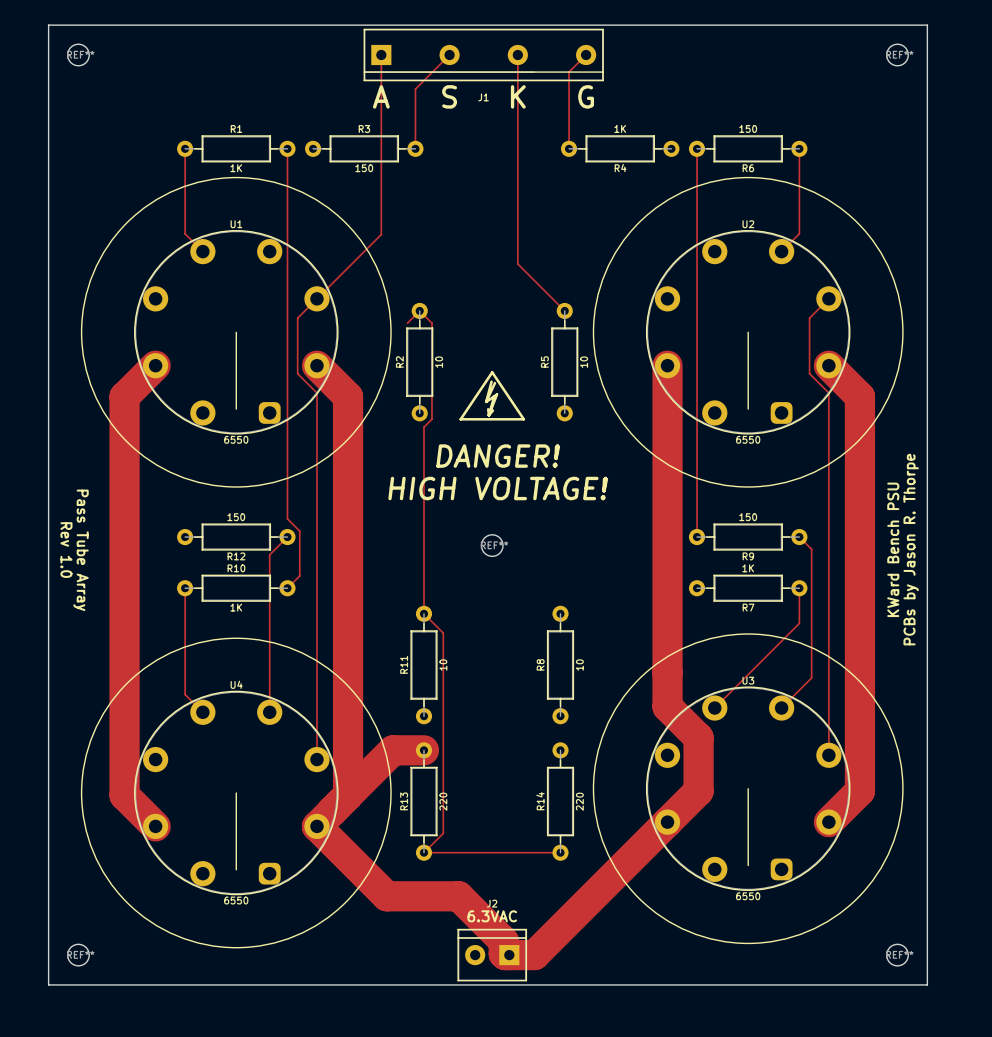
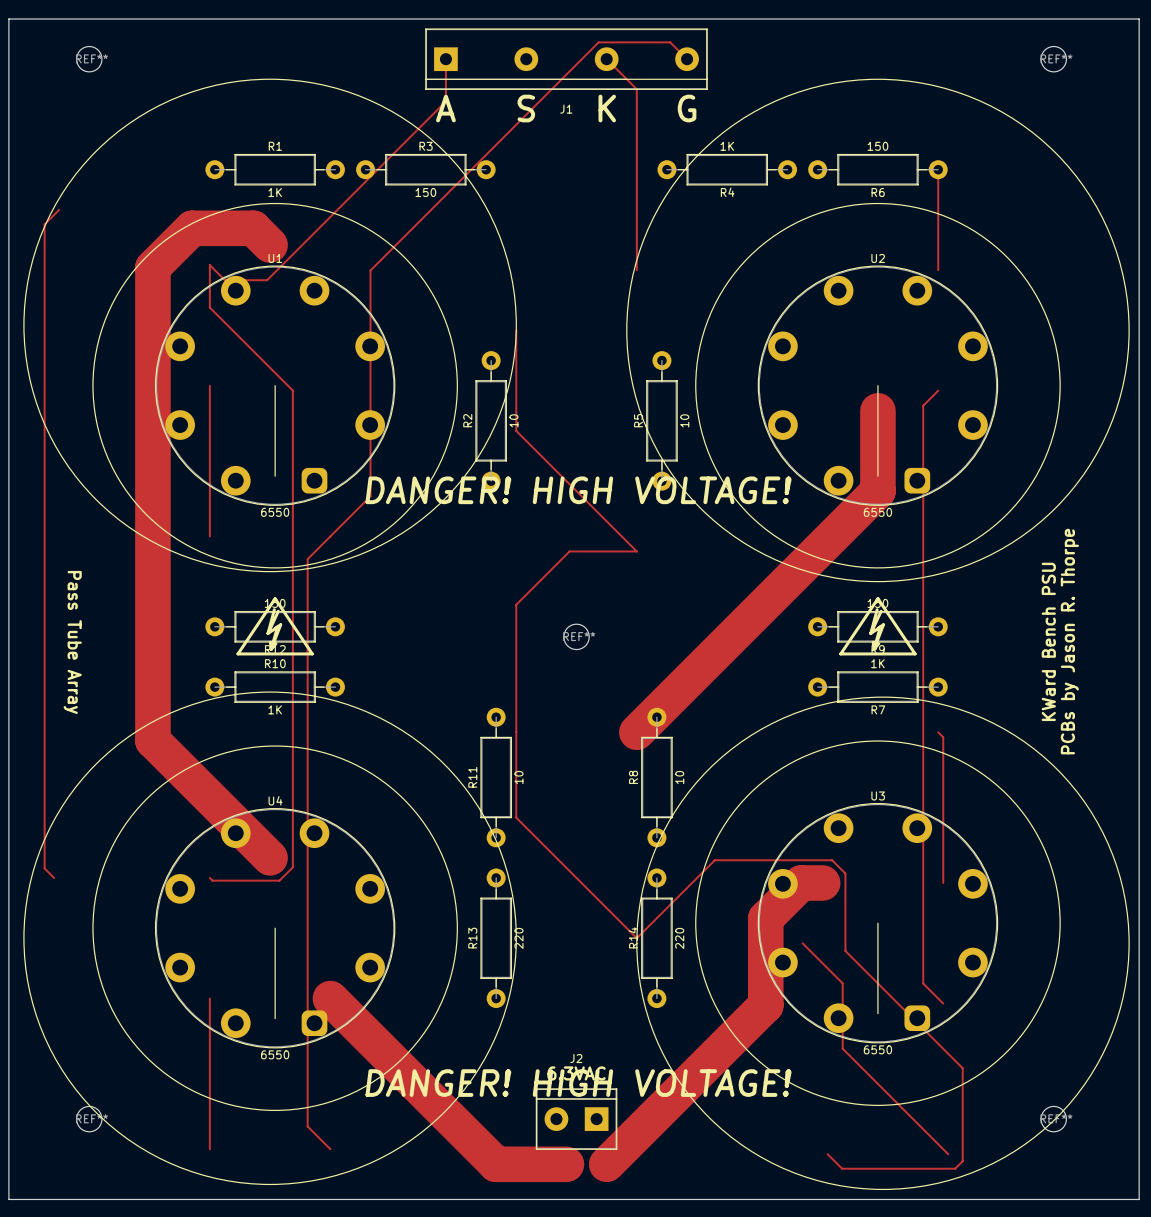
board edge: (48, 25) (48, 984) (927, 984) (927, 25) (48, 25) -> (8, 19) (8, 1199) (1139, 1199) (1139, 19) (8, 19)
track: (449, 55) (415, 89) (415, 148) -> none
track: (517, 55) (517, 264) (564, 310) -> (606, 59) (636, 89) (636, 270)
track: (586, 55) (569, 72) (569, 148) -> (687, 59) (670, 42) (598, 42) (370, 270) (370, 496) (307, 559) (307, 1126) (330, 1149)
drawing: none -> [23, 78, 517, 573]
drawing: none -> [626, 78, 1130, 583]
track: (381, 90) (381, 234) (297, 318) (297, 373) (316, 393) (316, 759) -> (445, 101) (267, 280) (224, 280) (209, 265) (209, 307) (292, 390) (292, 867) (279, 880) (212, 880) (209, 877)
track: (185, 148) (185, 233) (202, 251) -> none
track: (287, 148) (287, 518) (299, 531) (299, 575) (287, 588) -> none
track: (697, 148) (697, 537) -> none
track: none -> (59, 209) (44, 224) (44, 868) (54, 877)
track: none -> (270, 245) (253, 228) (192, 228) (152, 267) (152, 740) (270, 857)
track: (799, 233) (781, 251) -> (938, 269) (938, 270)
track: none -> (516, 330) (516, 430) (636, 551) (569, 551) (516, 604) (516, 817) (636, 938) (714, 860) (832, 860) (845, 873) (845, 950) (962, 1068) (962, 1161) (955, 1168) (842, 1168) (827, 1154)
track: (828, 298) (809, 318) (809, 373) (828, 393) (828, 755) -> none
track: (407, 323) (419, 310) (431, 323) (431, 419) (423, 427) (423, 613) (443, 633) (443, 833) (423, 852) (560, 852) -> none
track: none -> (209, 385) (209, 536)
track: none -> (938, 390) (923, 405) (923, 983) (943, 1003)
track: none -> (877, 410) (877, 491) (636, 732)
track: (155, 365) (124, 396) (124, 795) (155, 826) -> none
track: (316, 365) (348, 396) (348, 795) -> none
track: (667, 365) (667, 706) (698, 737) (698, 791) (534, 955) (505, 955) (503, 941) (458, 896) (386, 896) (316, 826) (393, 750) (423, 750) -> none
track: (828, 365) (859, 396) (859, 791) (828, 822) -> none
drawing: [459, 371, 526, 421] -> none
text: none -> DANGER! HIGH VOLTAGE! (578, 490)
text: DANGER! (498, 456) -> none
text: HIGH VOLTAGE! (498, 488) -> none
drawing: none -> [236, 597, 314, 656]
drawing: none -> [839, 597, 917, 656]
track: (287, 537) (269, 554) (269, 712) -> none
track: (799, 537) (811, 549) (811, 678) (781, 708) -> none
text: Rev 1.0 (66, 550) -> Pass Tube Array (72, 642)
text: Pass Tube Array (81, 550) -> none
track: (185, 588) (185, 694) (202, 712) -> none
track: (799, 588) (799, 623) (714, 708) -> none
drawing: none -> [23, 691, 517, 1185]
drawing: none -> [636, 696, 1130, 1190]
track: none -> (938, 732) (943, 737) (943, 883)
track: none -> (822, 883) (801, 883) (765, 918) (765, 1005) (606, 1164)
track: none -> (802, 943) (842, 983) (842, 1048) (948, 1154)
track: none -> (209, 998) (209, 1149)
track: none -> (330, 998) (496, 1164) (566, 1164)
text: none -> DANGER! HIGH VOLTAGE! (578, 1083)

